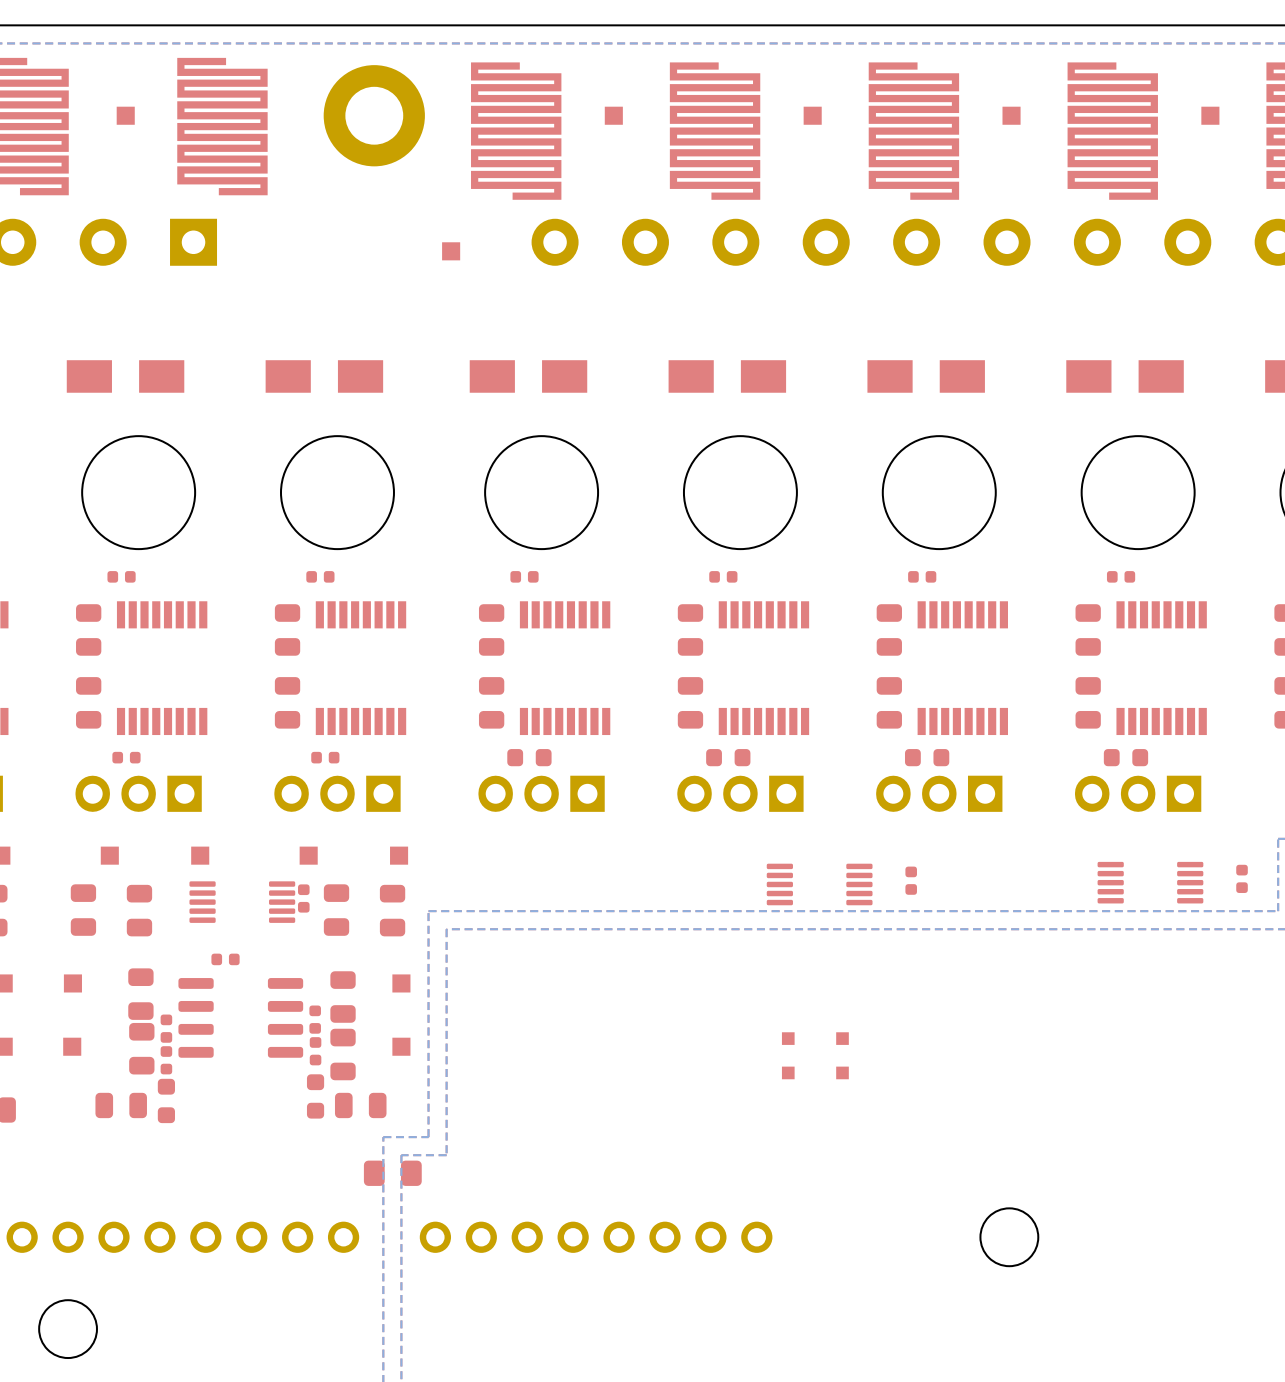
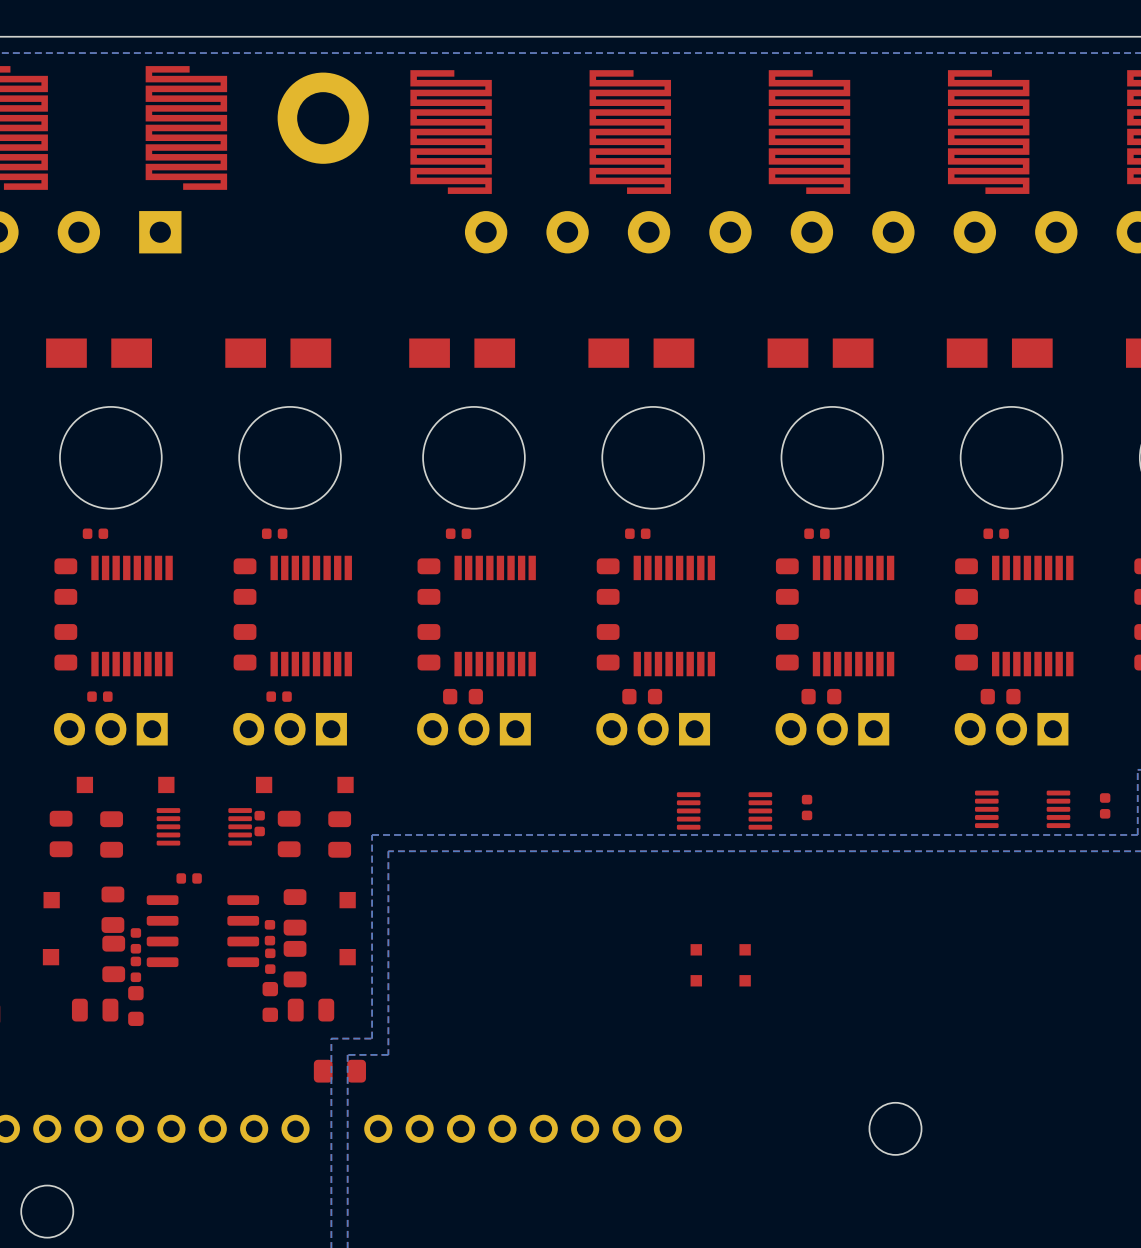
part: (125, 115) -> none
part: (613, 115) -> none
part: (812, 115) -> none
part: (1011, 115) -> none
part: (1210, 115) -> none
part: (451, 251) -> none

